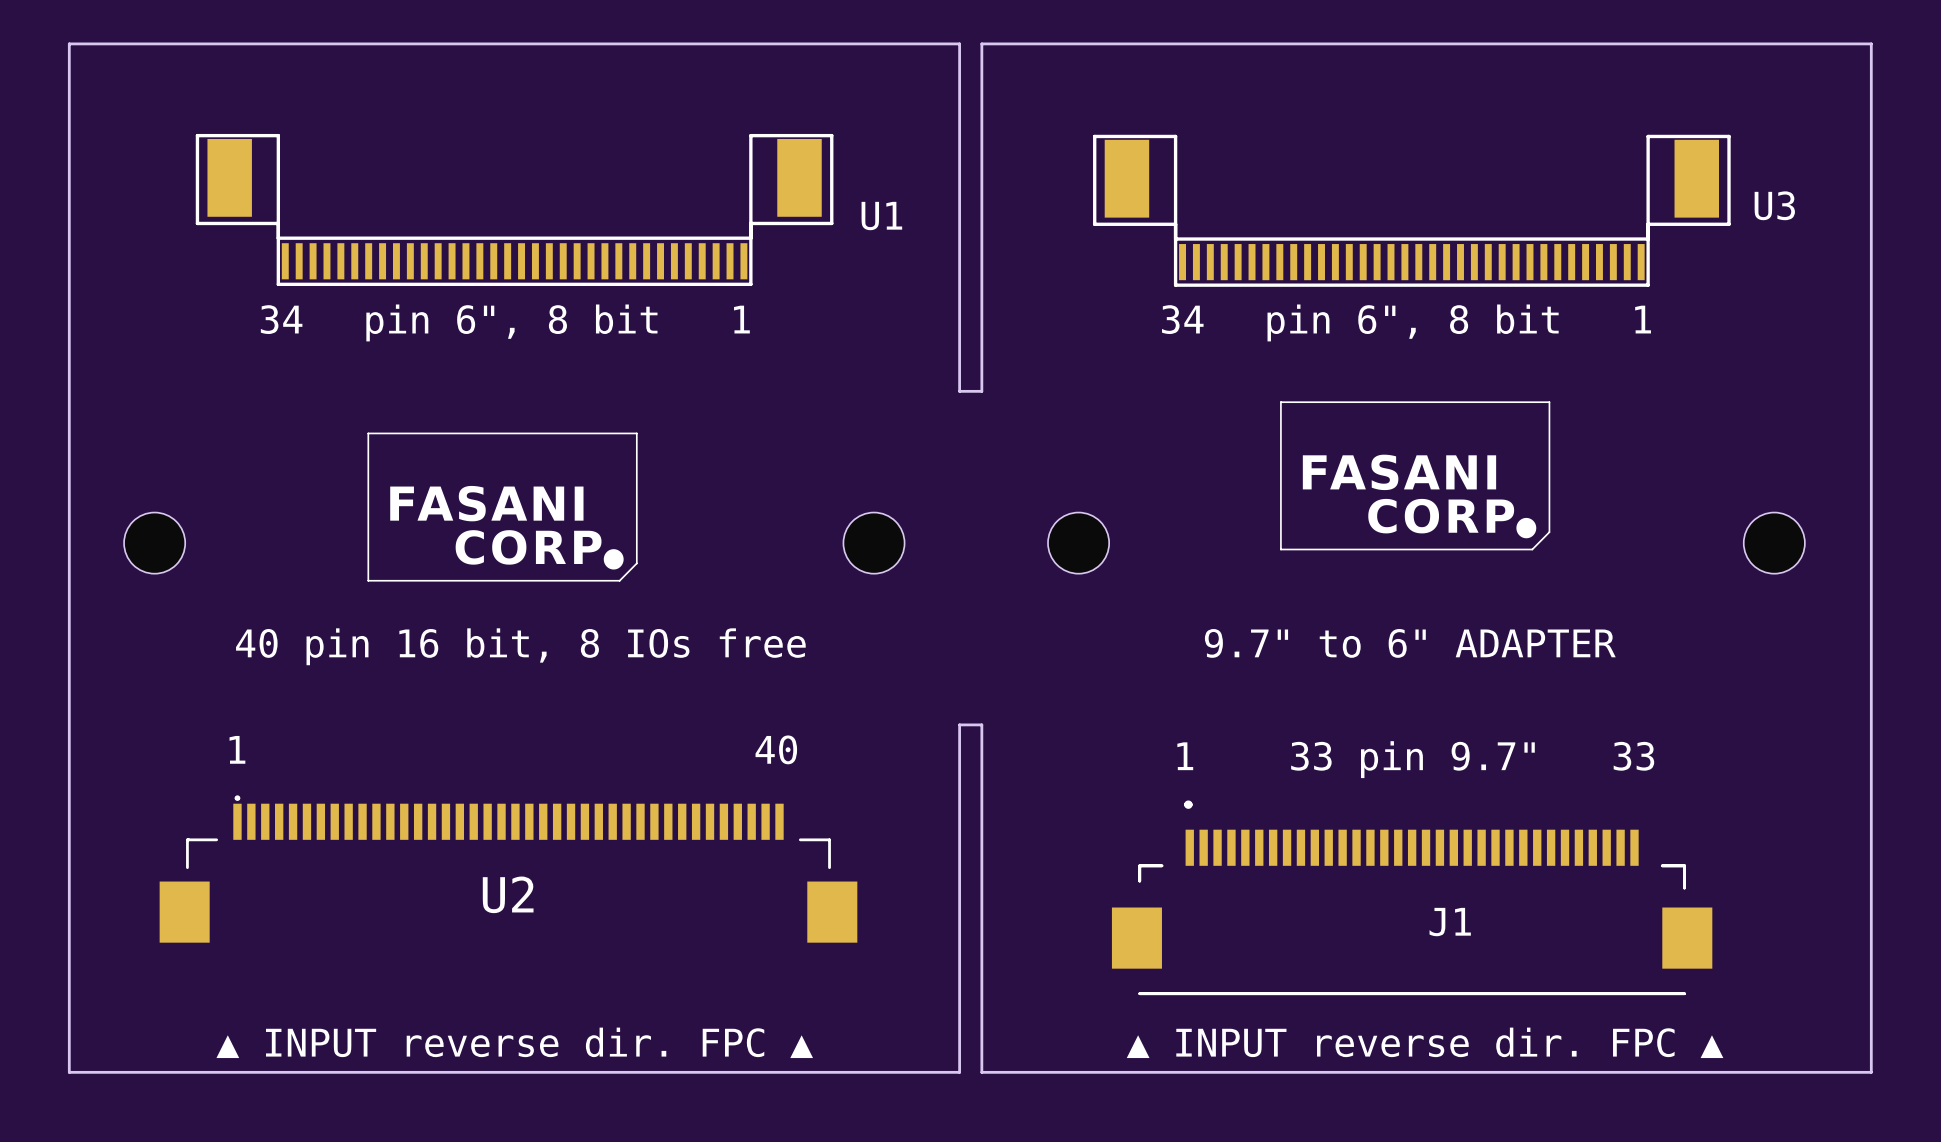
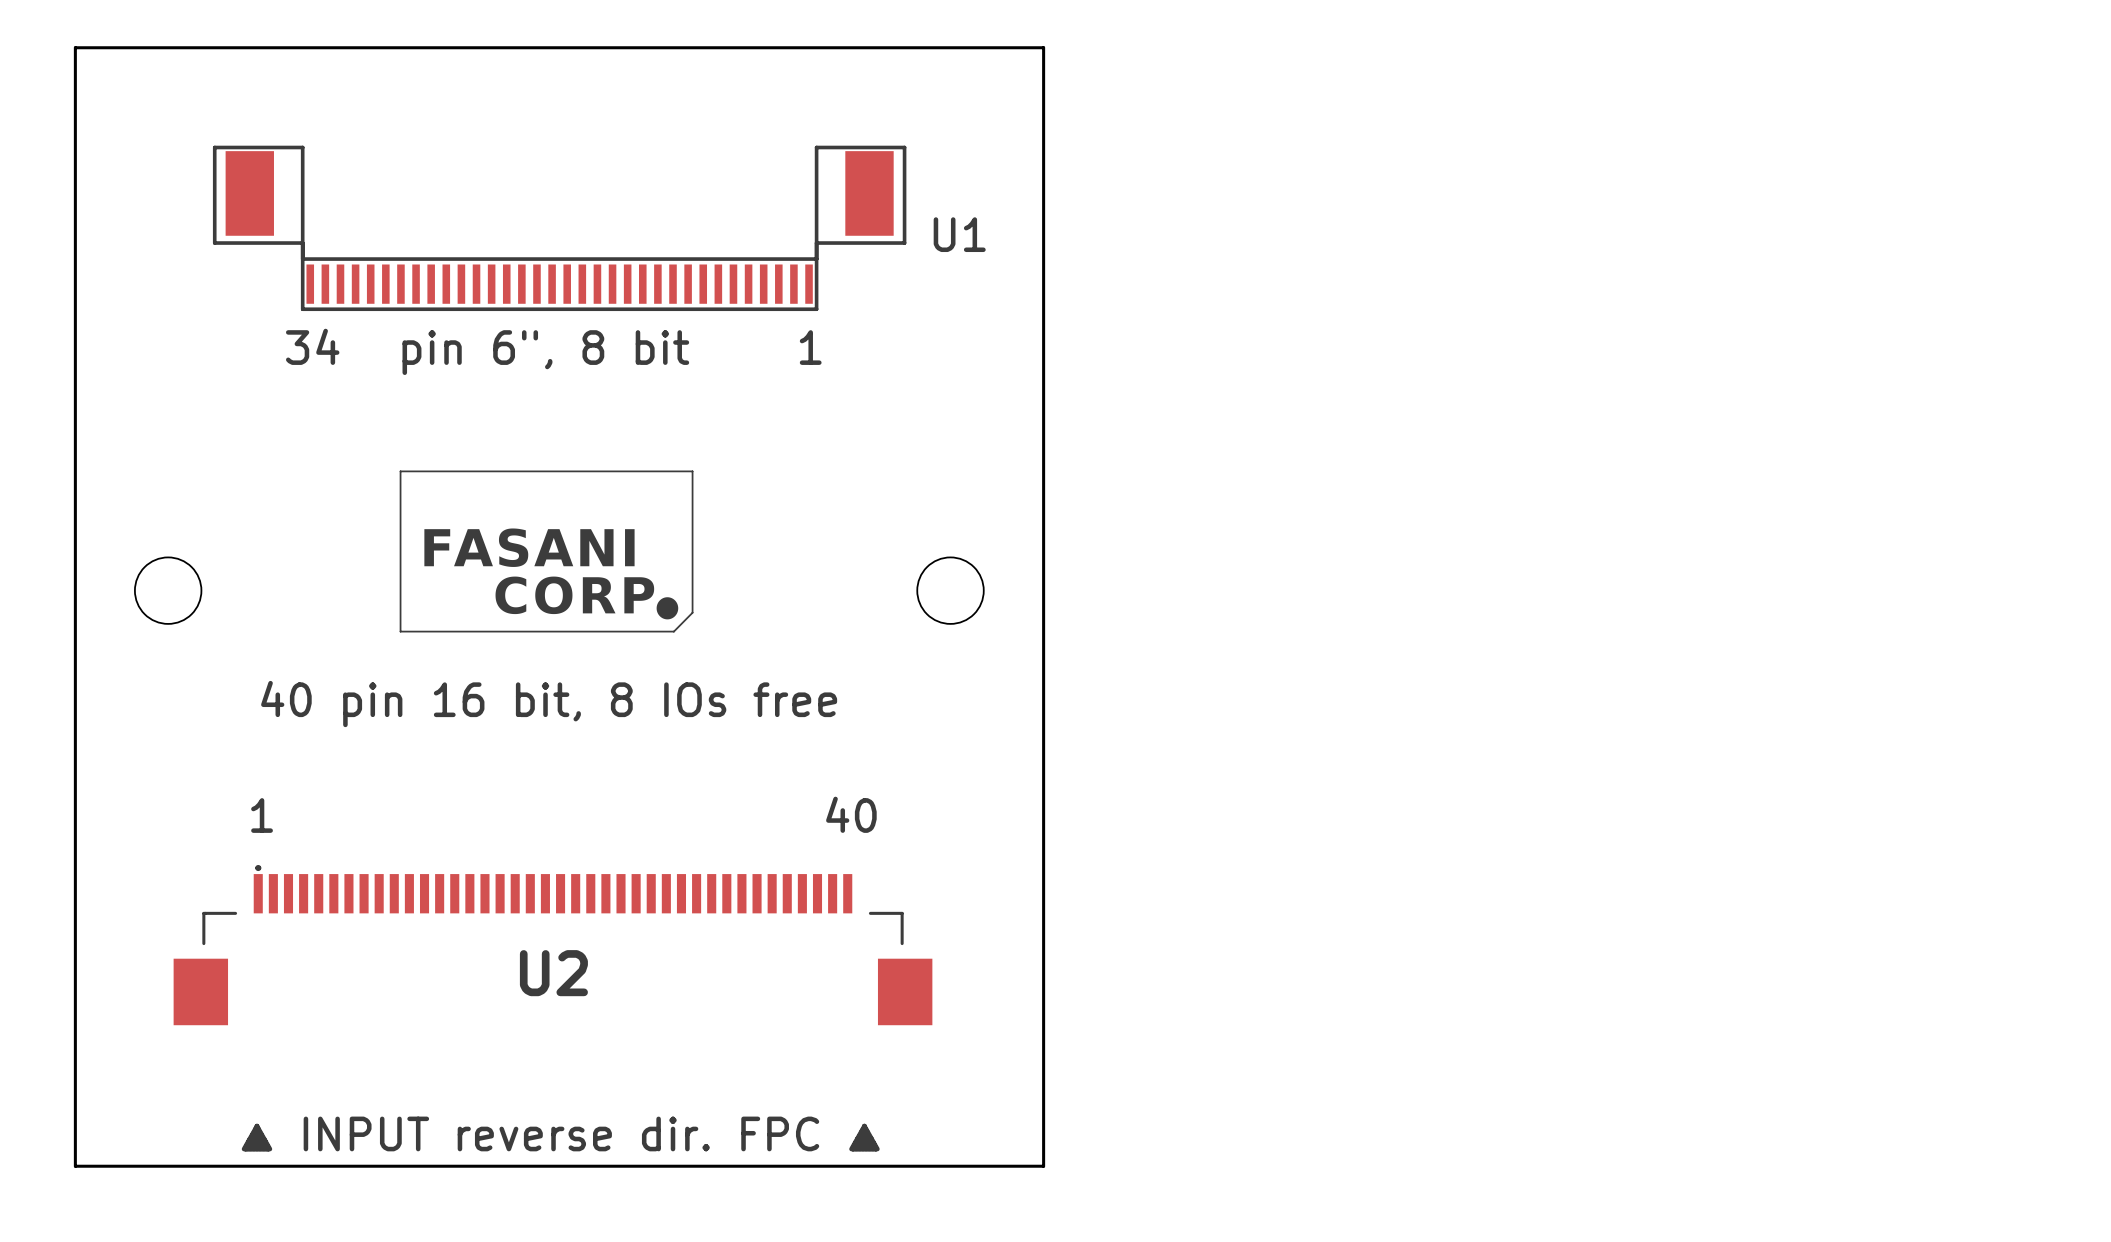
U3: (1411, 210) -> none
text: 34 (1182, 319) -> none
text: 1 (1643, 319) -> none
text: pin 6", 8 bit (1413, 322) -> none
board edge: (959, 391) (981, 391) (981, 43) (1871, 43) (1871, 1072) (981, 1072) (981, 724) (959, 724) -> (1043, 425) (1043, 788)
line: (1280, 402) (1549, 402) (1549, 532) (1532, 549) (1280, 549) (1280, 402) -> none
drawing: [1302, 454, 1537, 539] -> none
part: (1078, 543) -> none
part: (1774, 543) -> none
text: 9.7" to 6" ADAPTER (1410, 643) -> none
text: 1 (1185, 756) -> none
text: 33 (1633, 756) -> none
text: 33 pin 9.7" (1412, 759) -> none
J1: (1412, 897) -> none
text: ▲ INPUT reverse dir. FPC ▲ (1425, 1042) -> none

